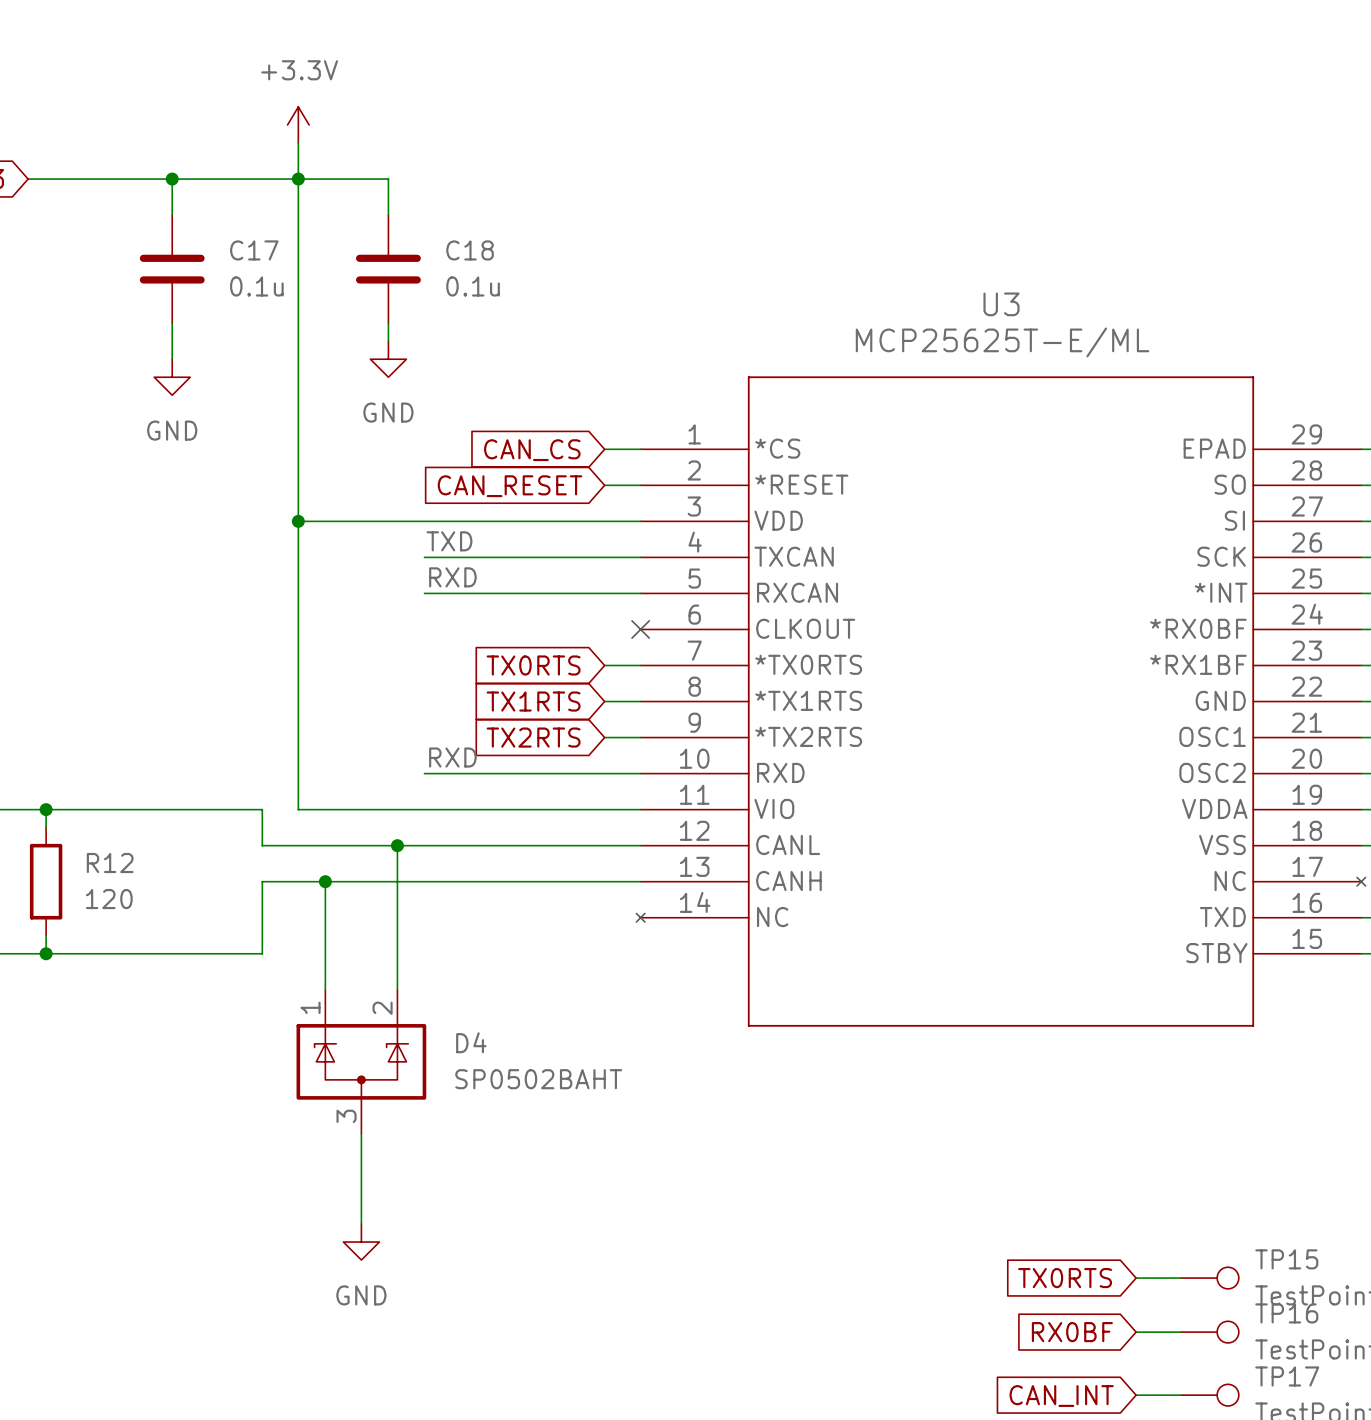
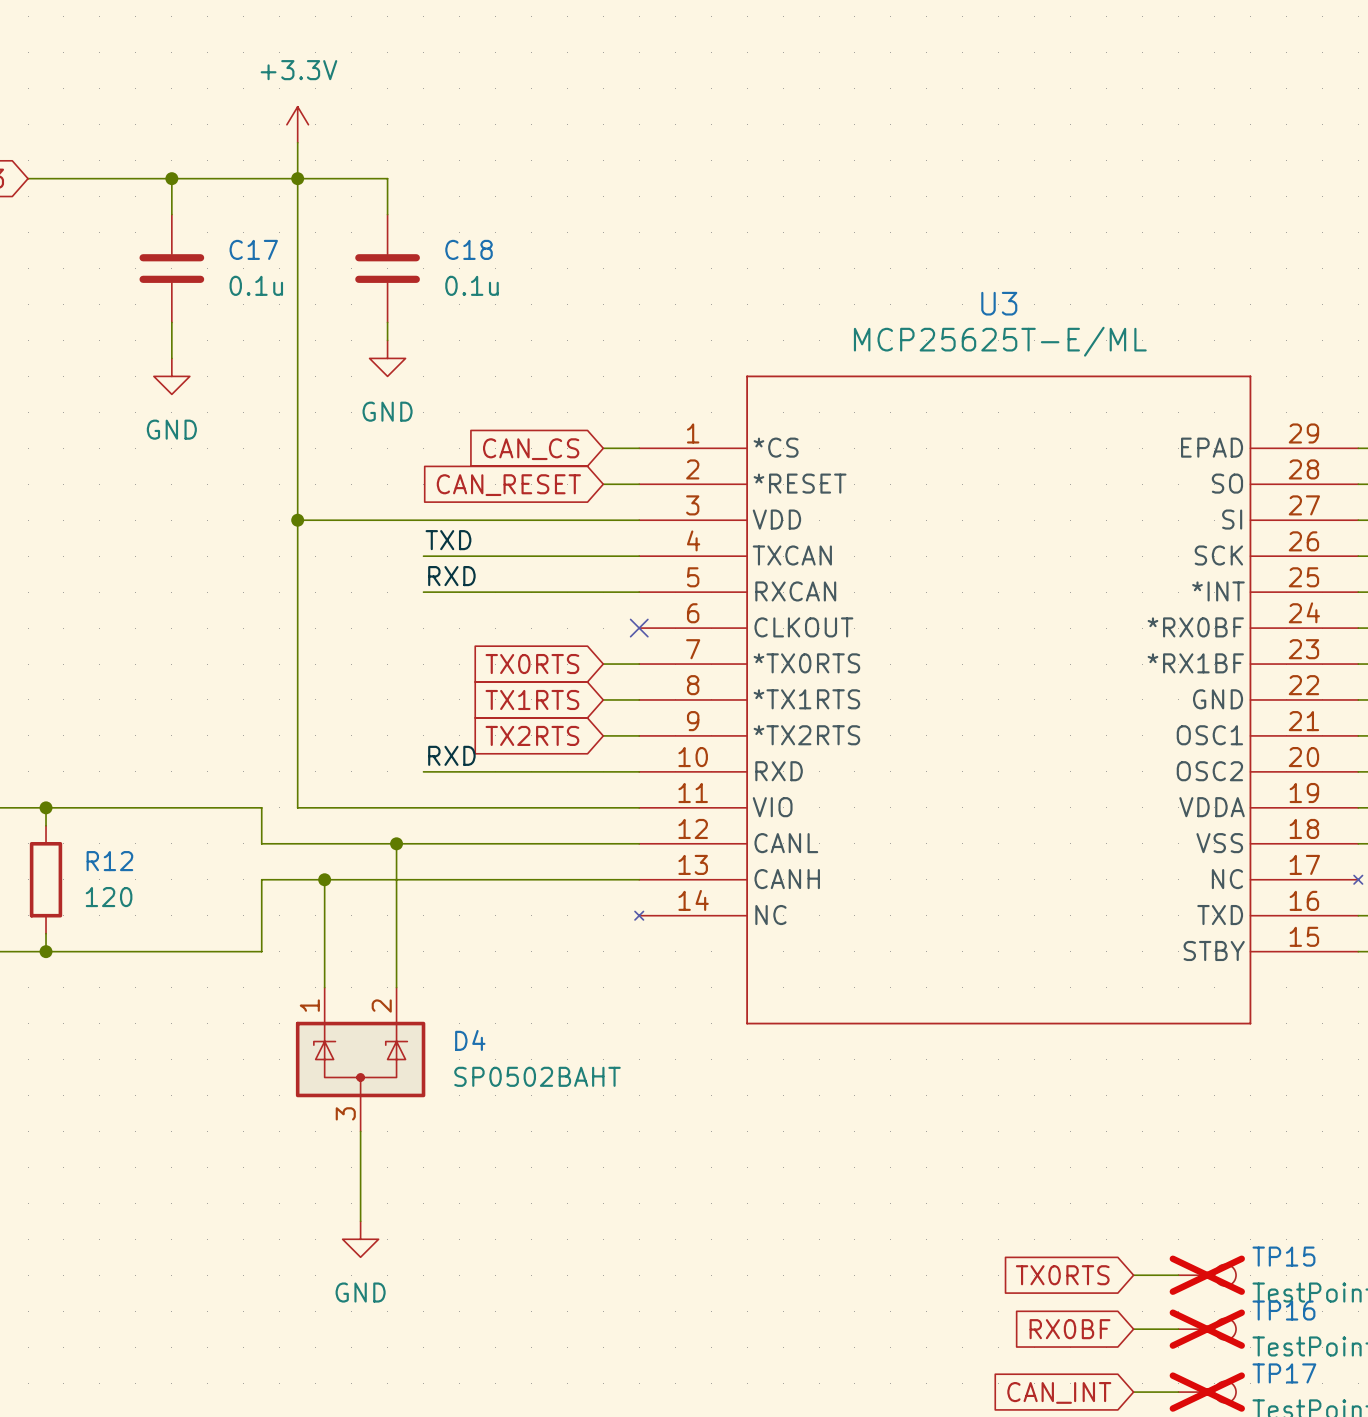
TP15 do-not-place cross: none -> (1207, 1275)
TP16 do-not-place cross: none -> (1207, 1329)
TP17 do-not-place cross: none -> (1207, 1392)

